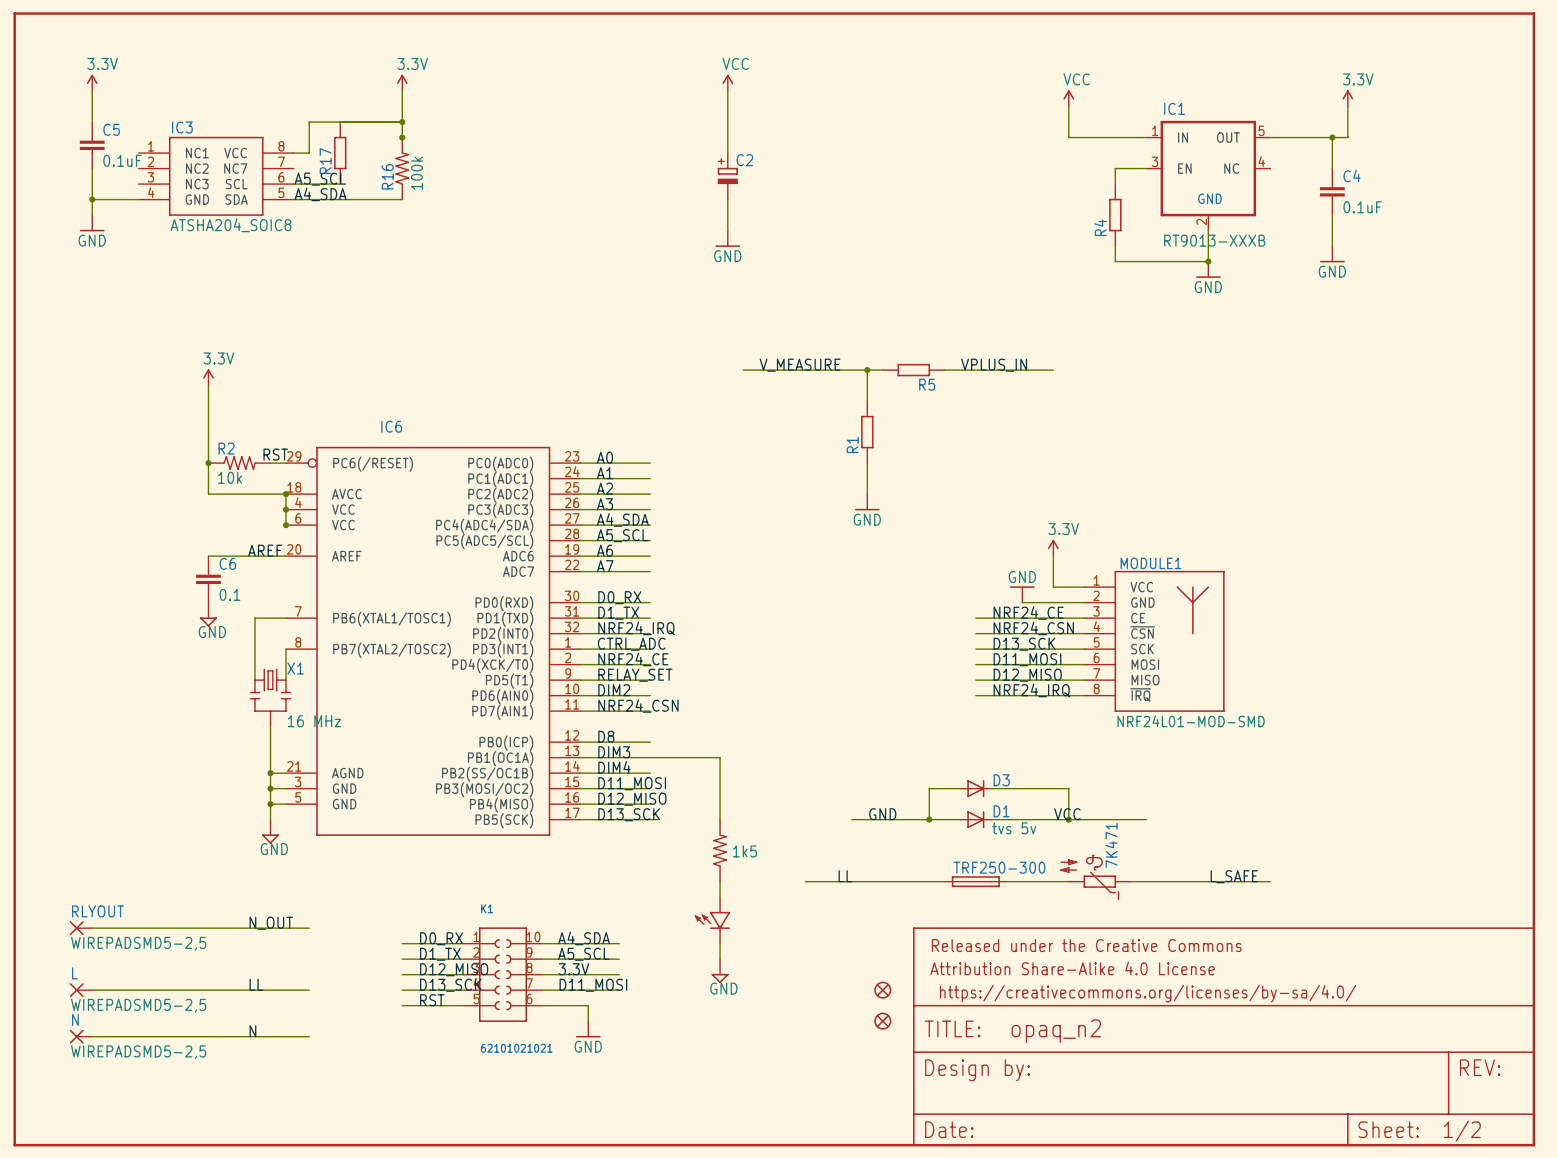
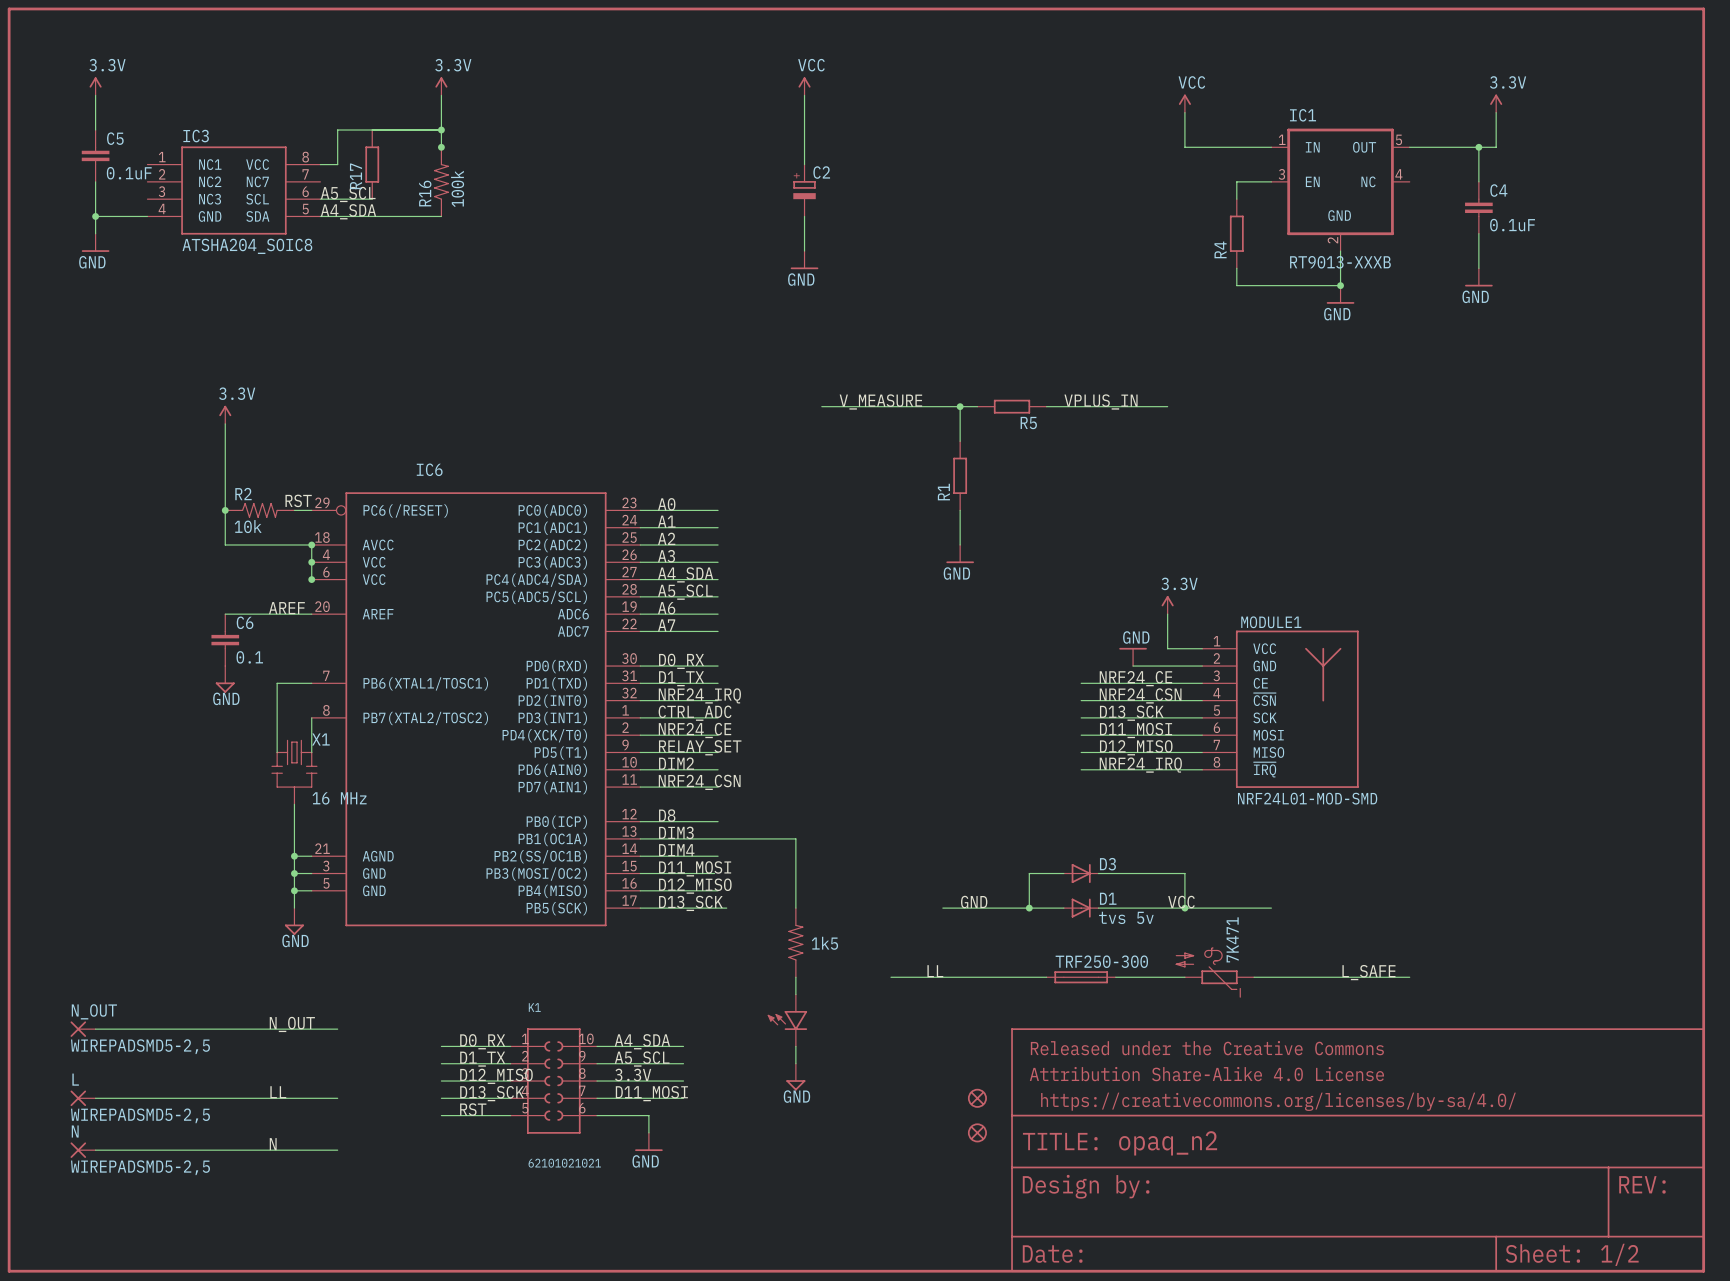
RLYOUT name: RLYOUT (97, 911) -> N_OUT (94, 1011)

